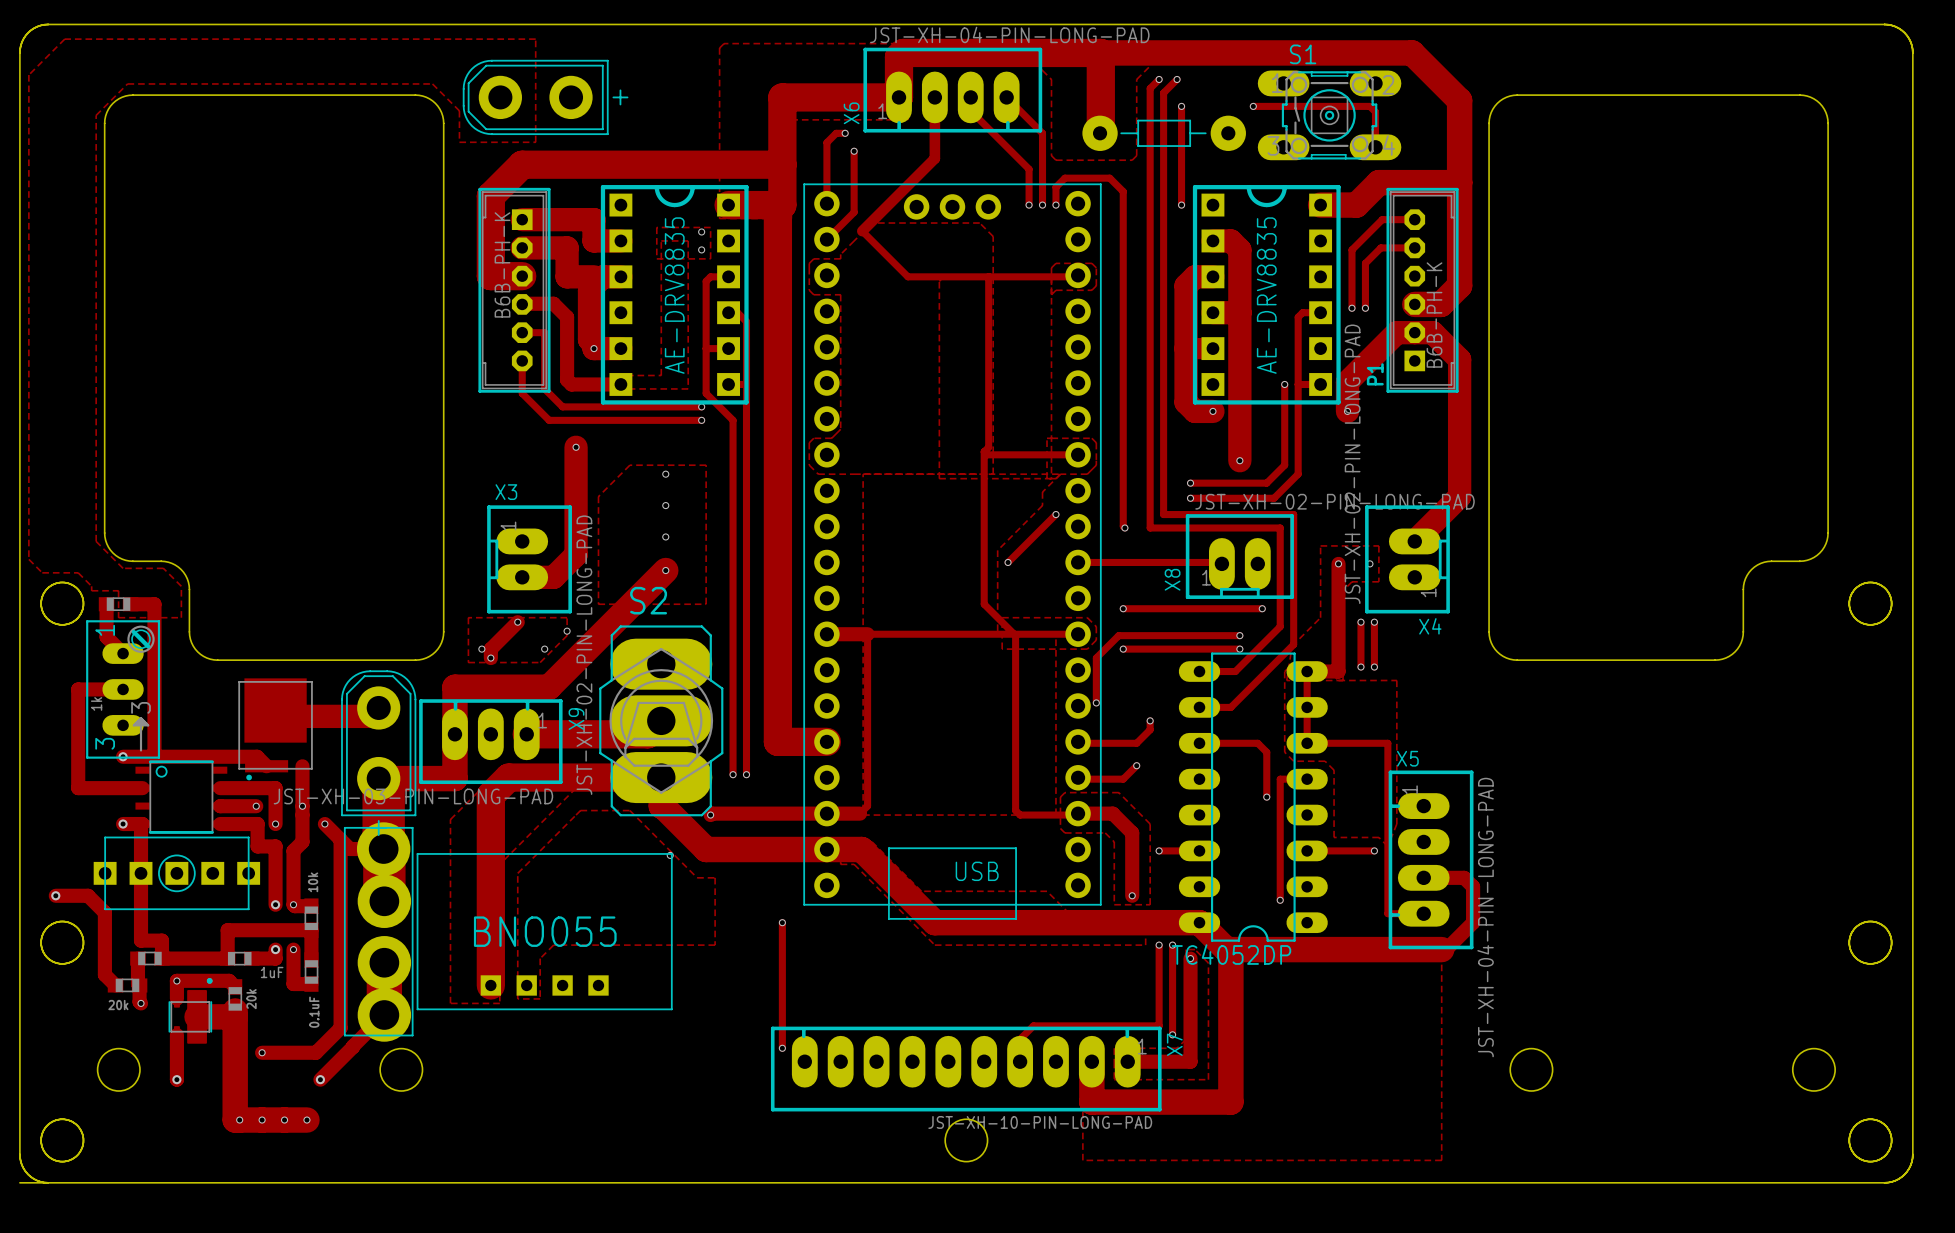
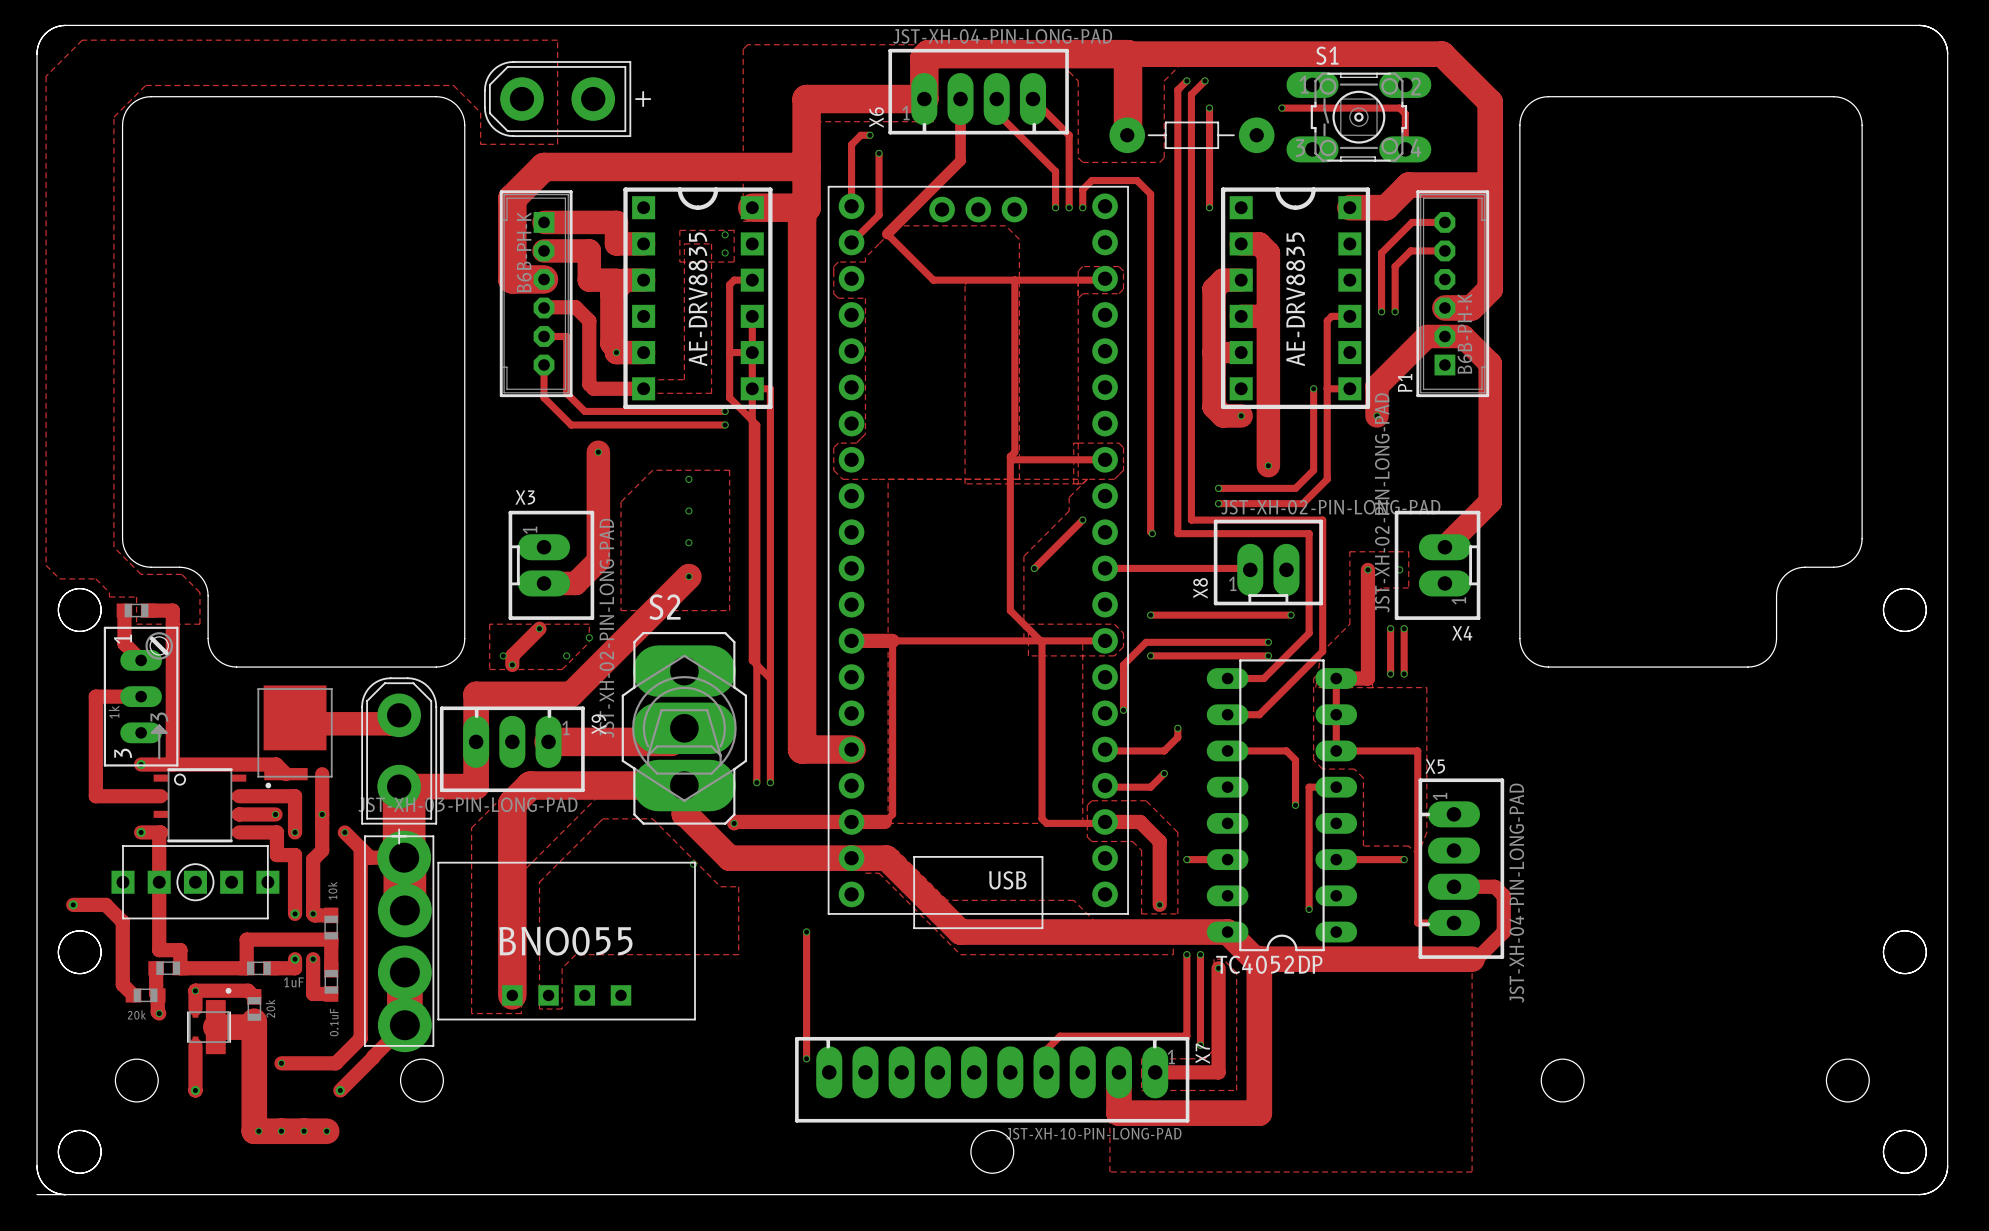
track: (728, 312) (737, 312) (746, 321) (746, 384) -> (752, 316) (752, 660) (770, 678)

